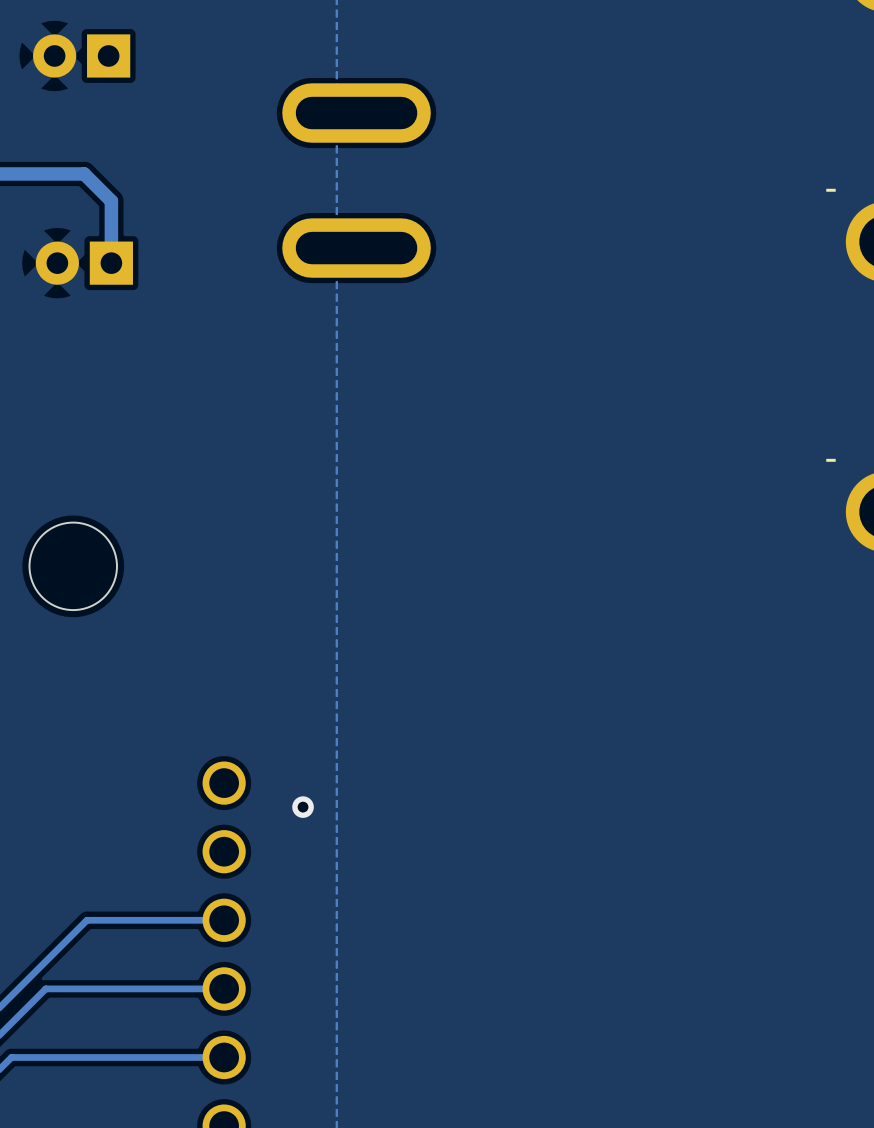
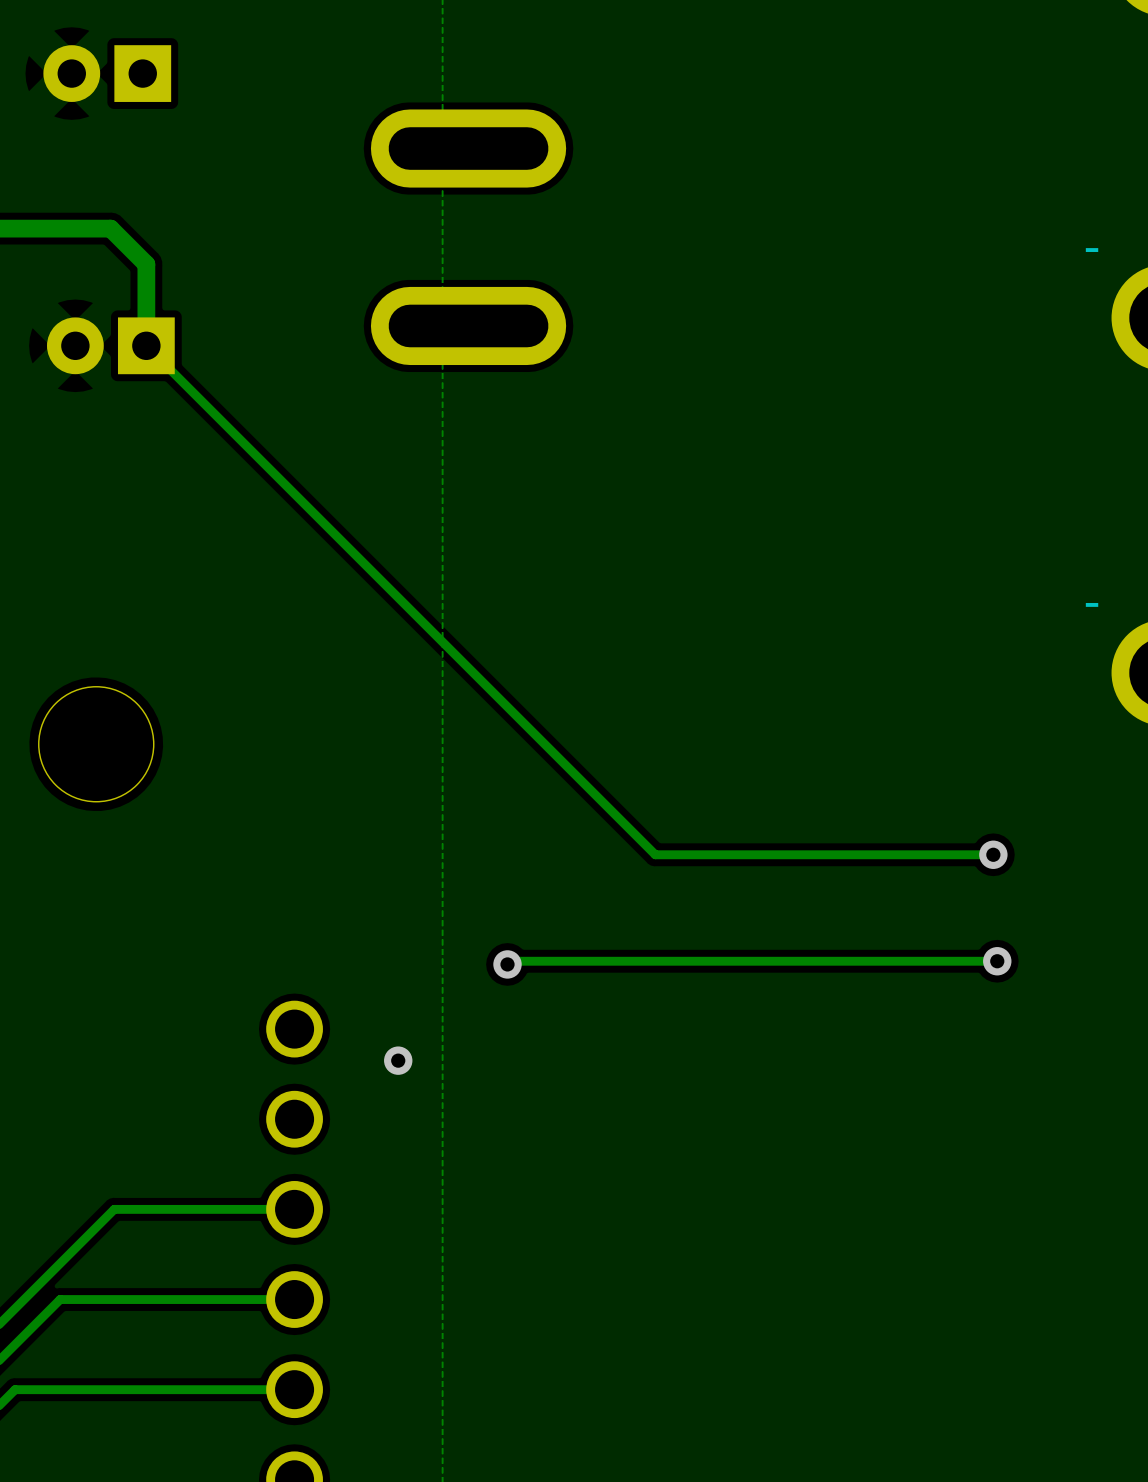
track: none -> (146, 345) (655, 854) (993, 854)
via: none -> (993, 854)
track: none -> (997, 961) (510, 961) (507, 964)
via: none -> (997, 961)
via: none -> (507, 964)

